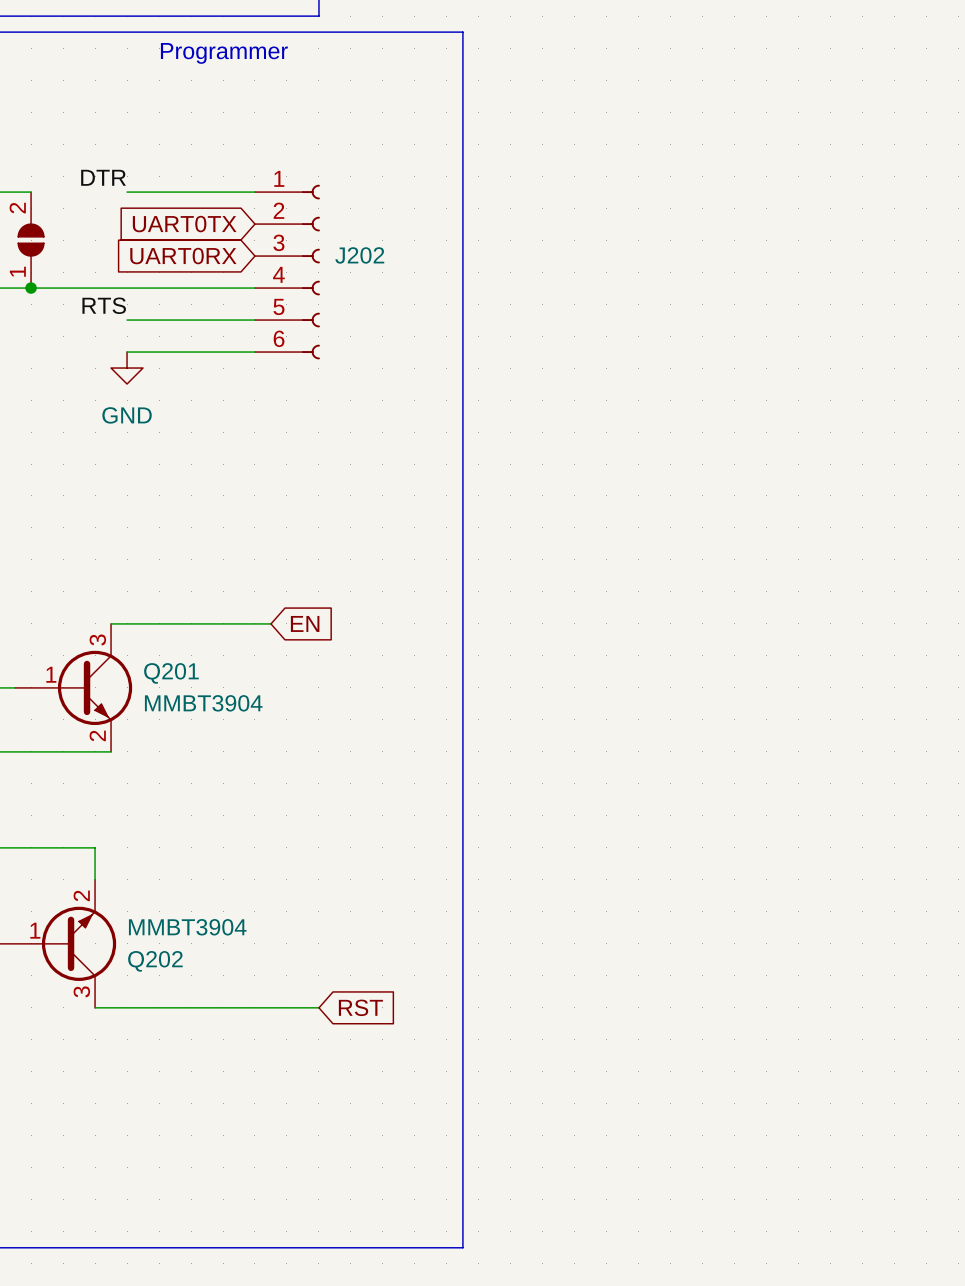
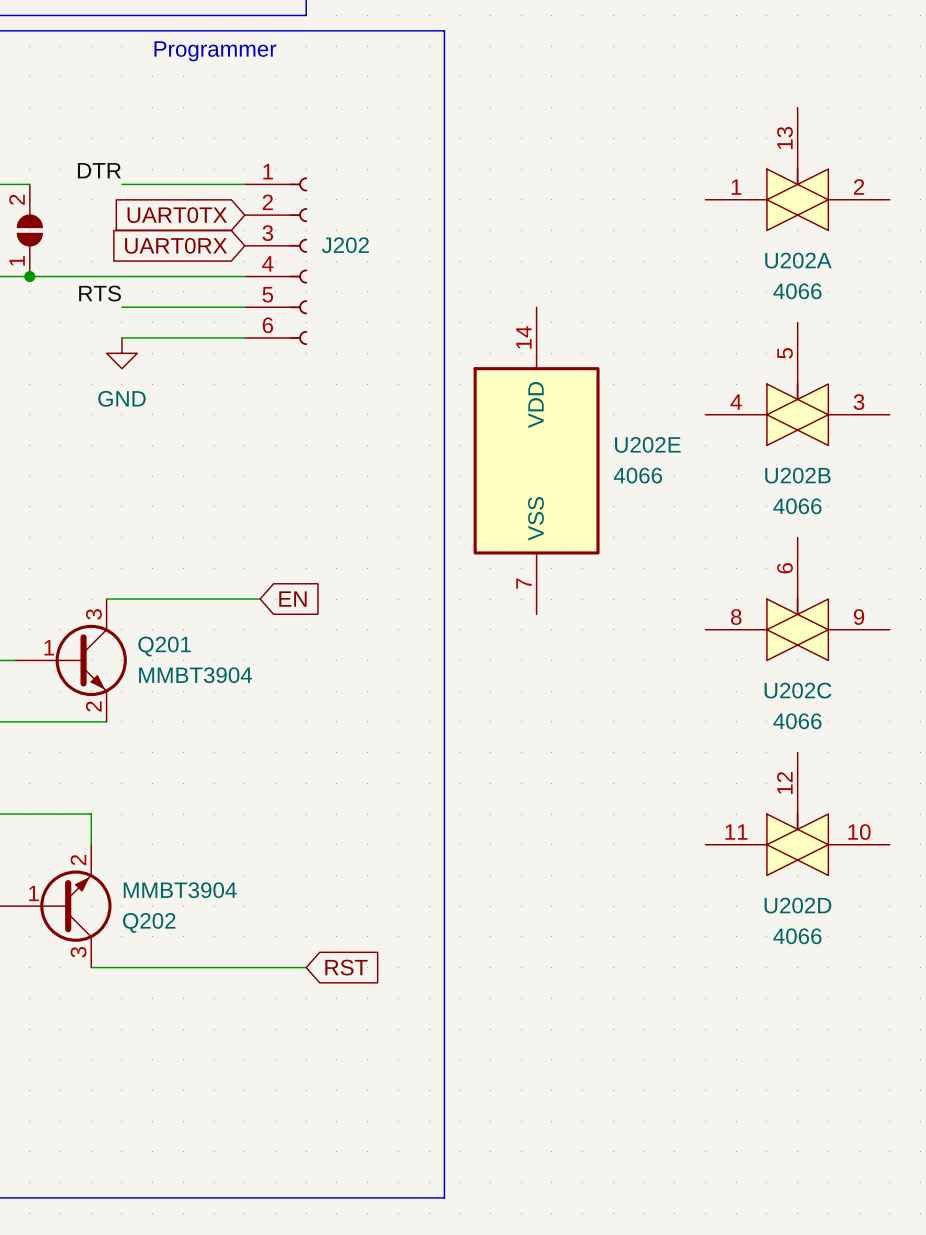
U202A: none -> 4066 (797, 169)
U202B: none -> 4066 (797, 384)
U202E: none -> 4066 (536, 460)
U202C: none -> 4066 (797, 599)
U202D: none -> 4066 (797, 814)

